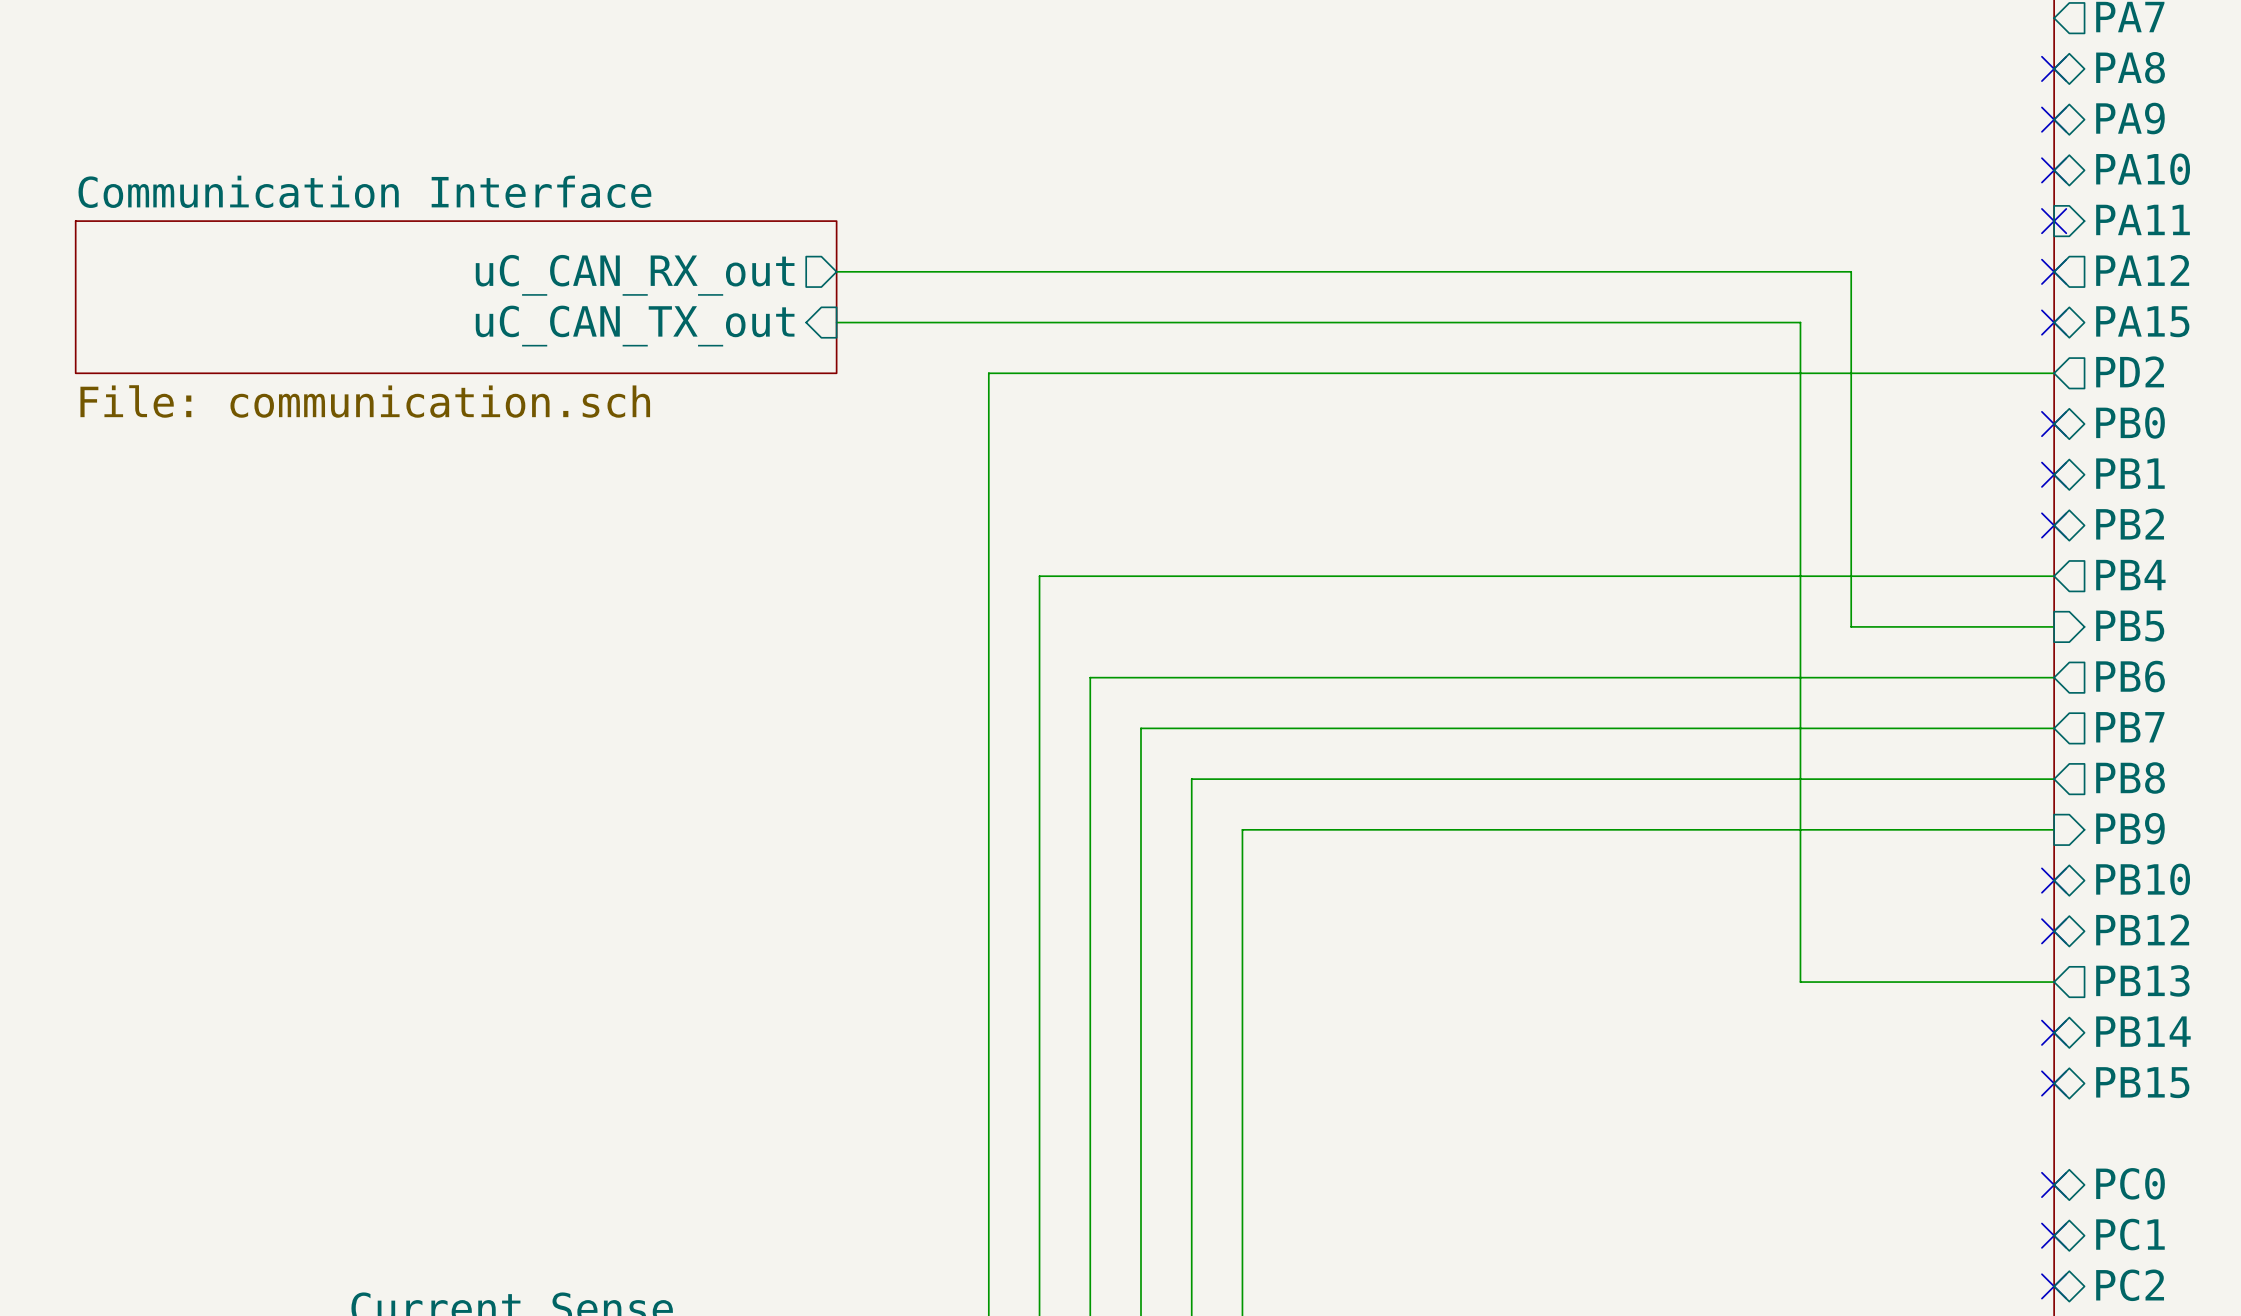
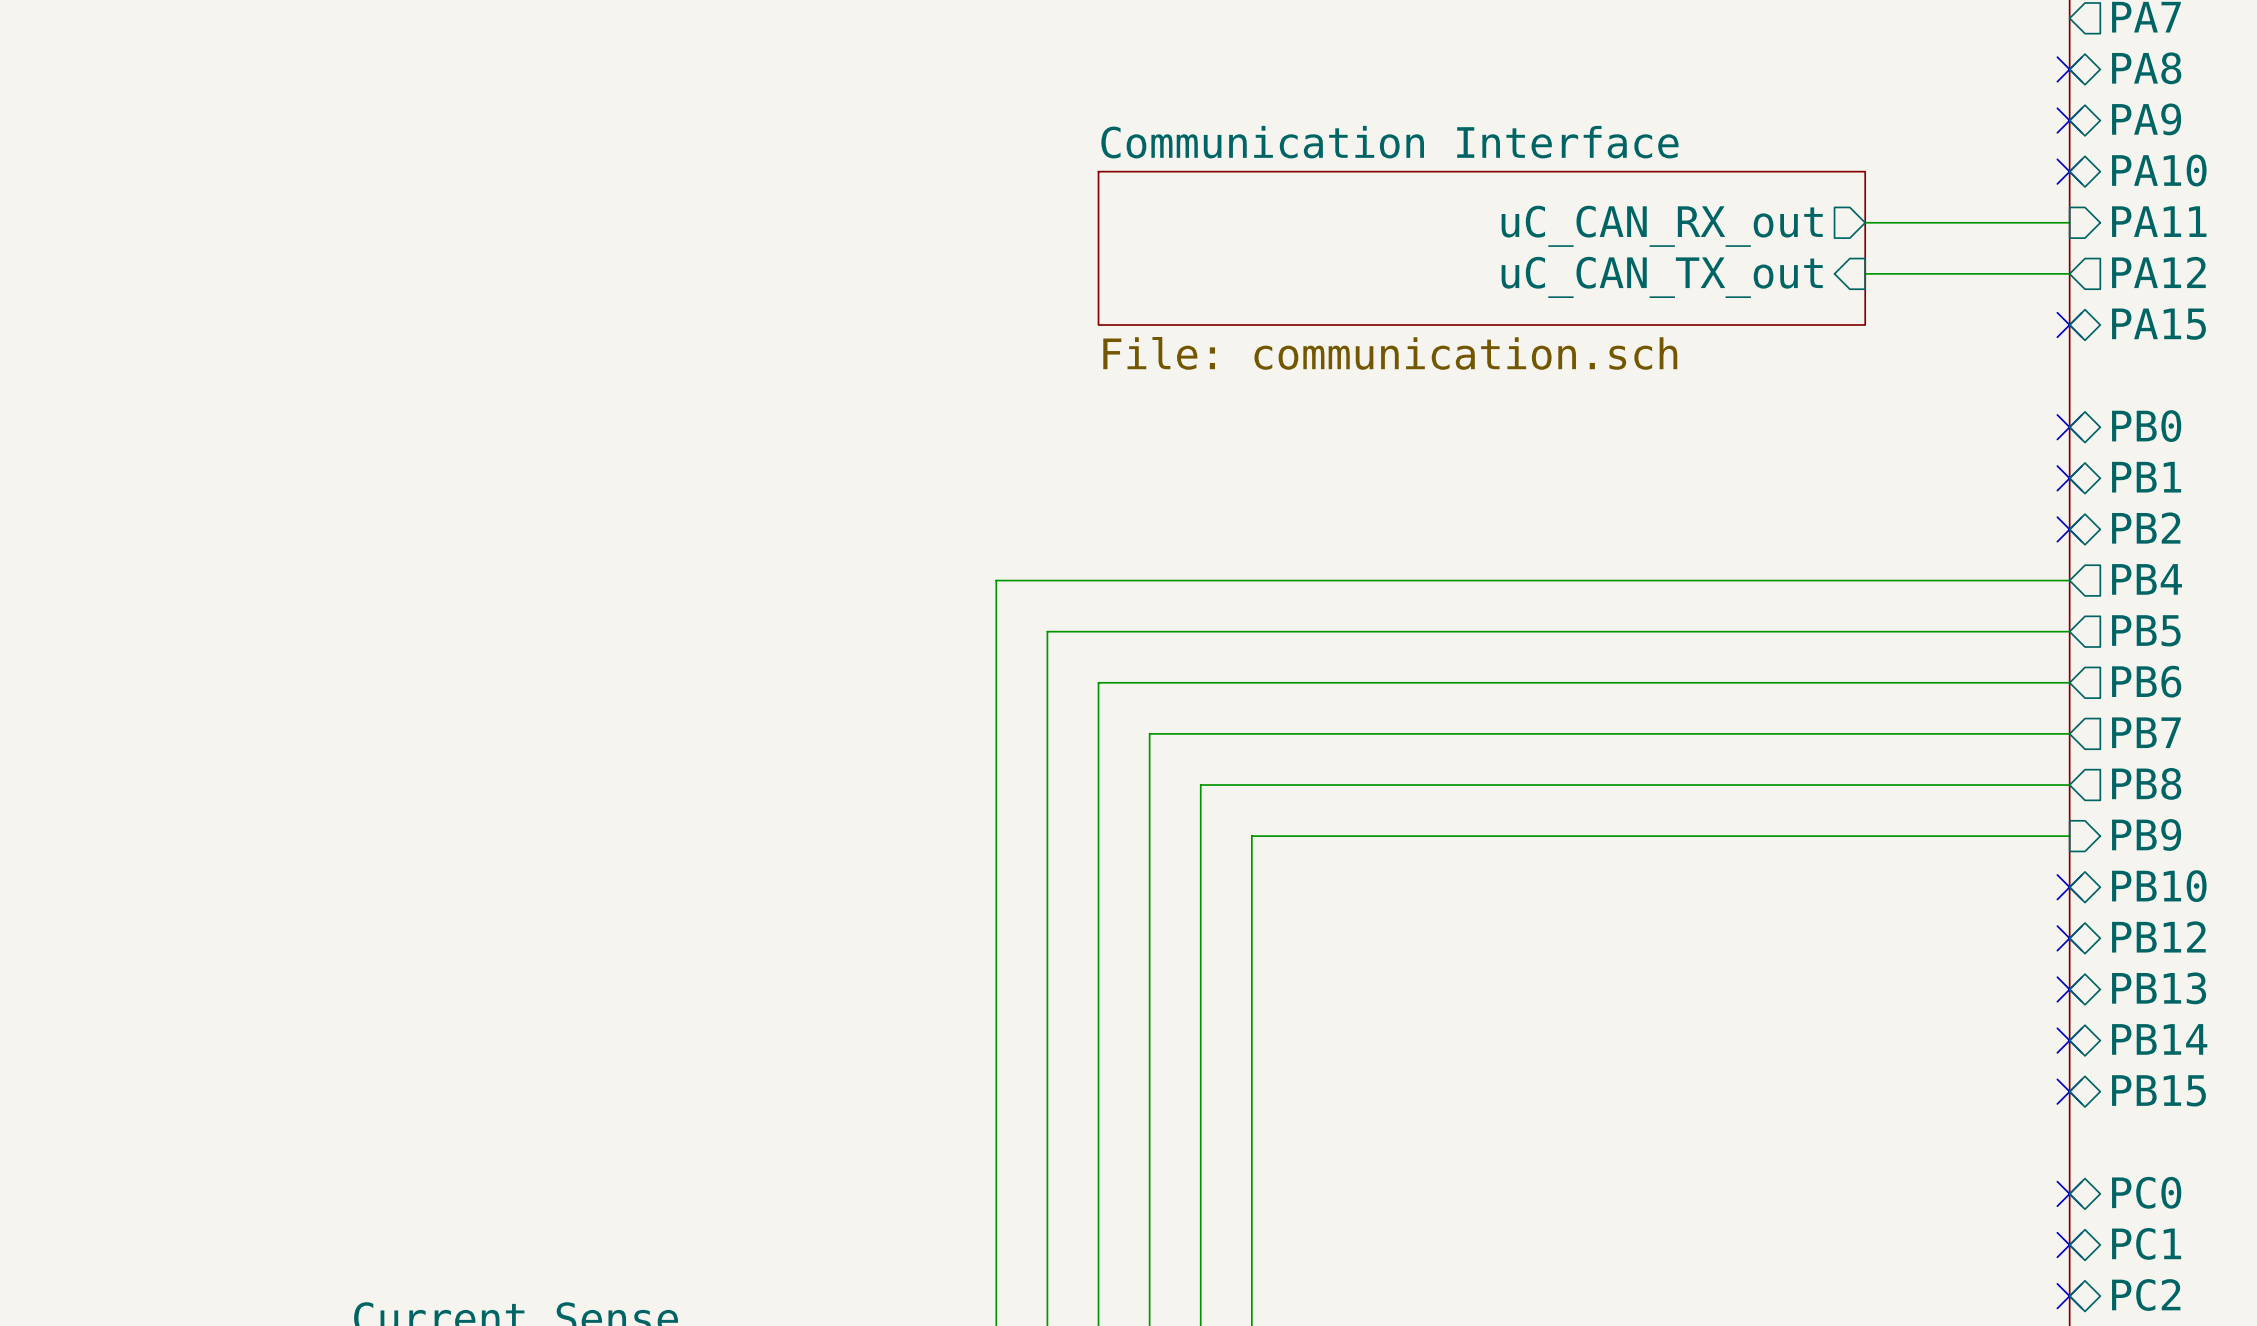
wire: none -> (1865, 222) (2069, 222)
no-connect mark: (2054, 221) -> none
sheet pin: none -> uC_CAN_RX_out (1662, 226)
sheet Communication Interface: none -> File: communication.sch (1481, 248)
wire: (836, 271) (1851, 271) (1851, 626) -> (1047, 631) (1865, 631)
wire: none -> (1865, 273) (2069, 273)
no-connect mark: (2054, 271) -> none
sheet pin: uC_CAN_RX_out (635, 275) -> none
sheet pin: none -> uC_CAN_TX_out (1662, 277)
sheet Communication Interface: File: communication.sch (456, 297) -> none
wire: (836, 322) (1800, 322) (1800, 982) (2054, 982) -> none
sheet pin: uC_CAN_TX_out (635, 326) -> none
sheet pin: PD2 (2130, 371) -> none
wire: (2054, 373) (988, 373) (988, 576) -> none
wire: (1039, 576) (1039, 626) -> (1047, 580) (996, 580)
sheet pin shape: input (2130, 626) -> output (2146, 630)
sheet pin shape: output (2142, 980) -> bidirectional (2159, 988)
no-connect mark: none -> (2069, 989)

